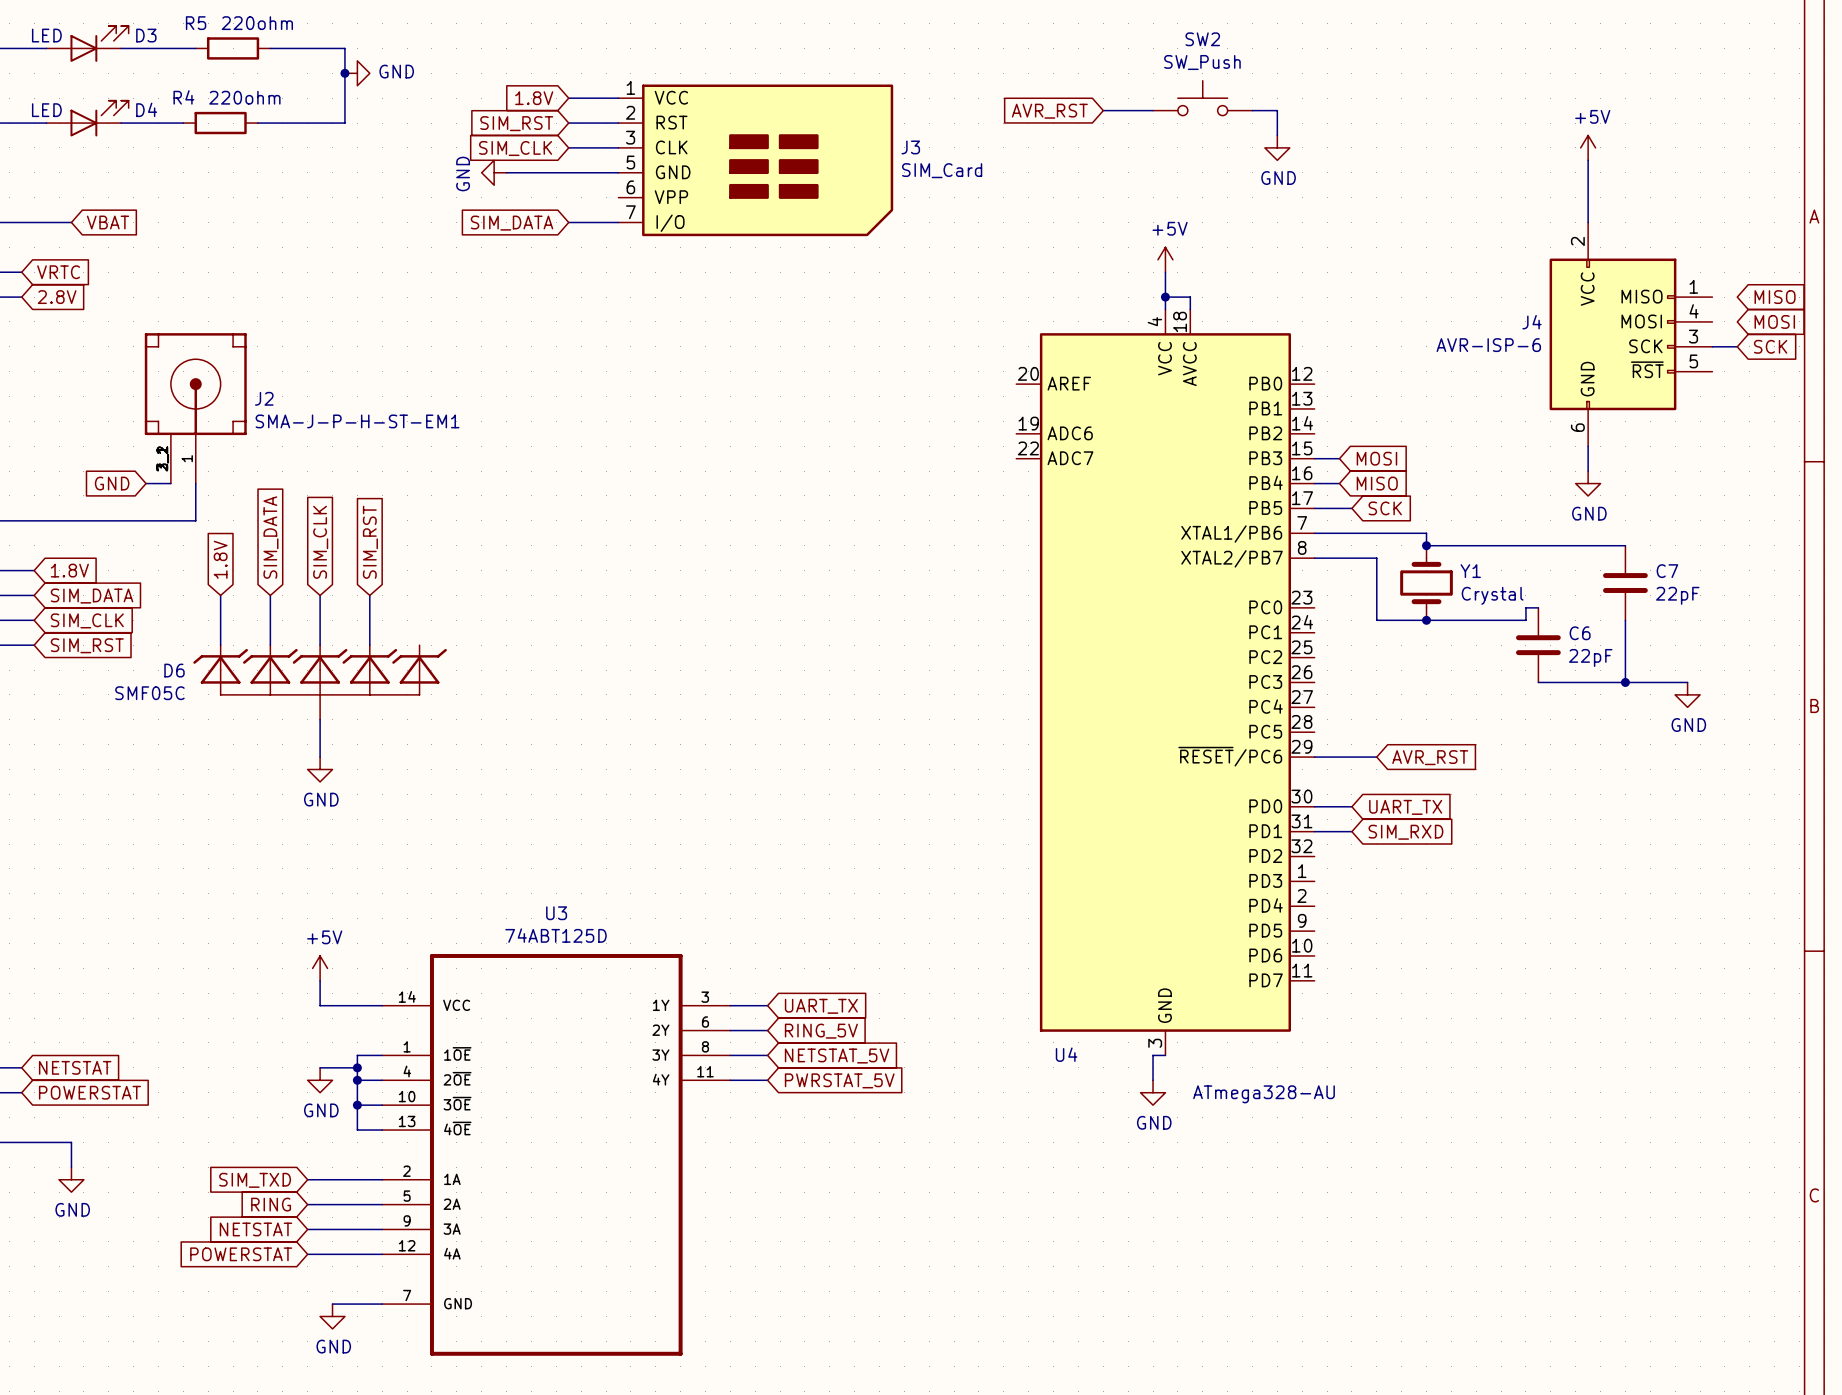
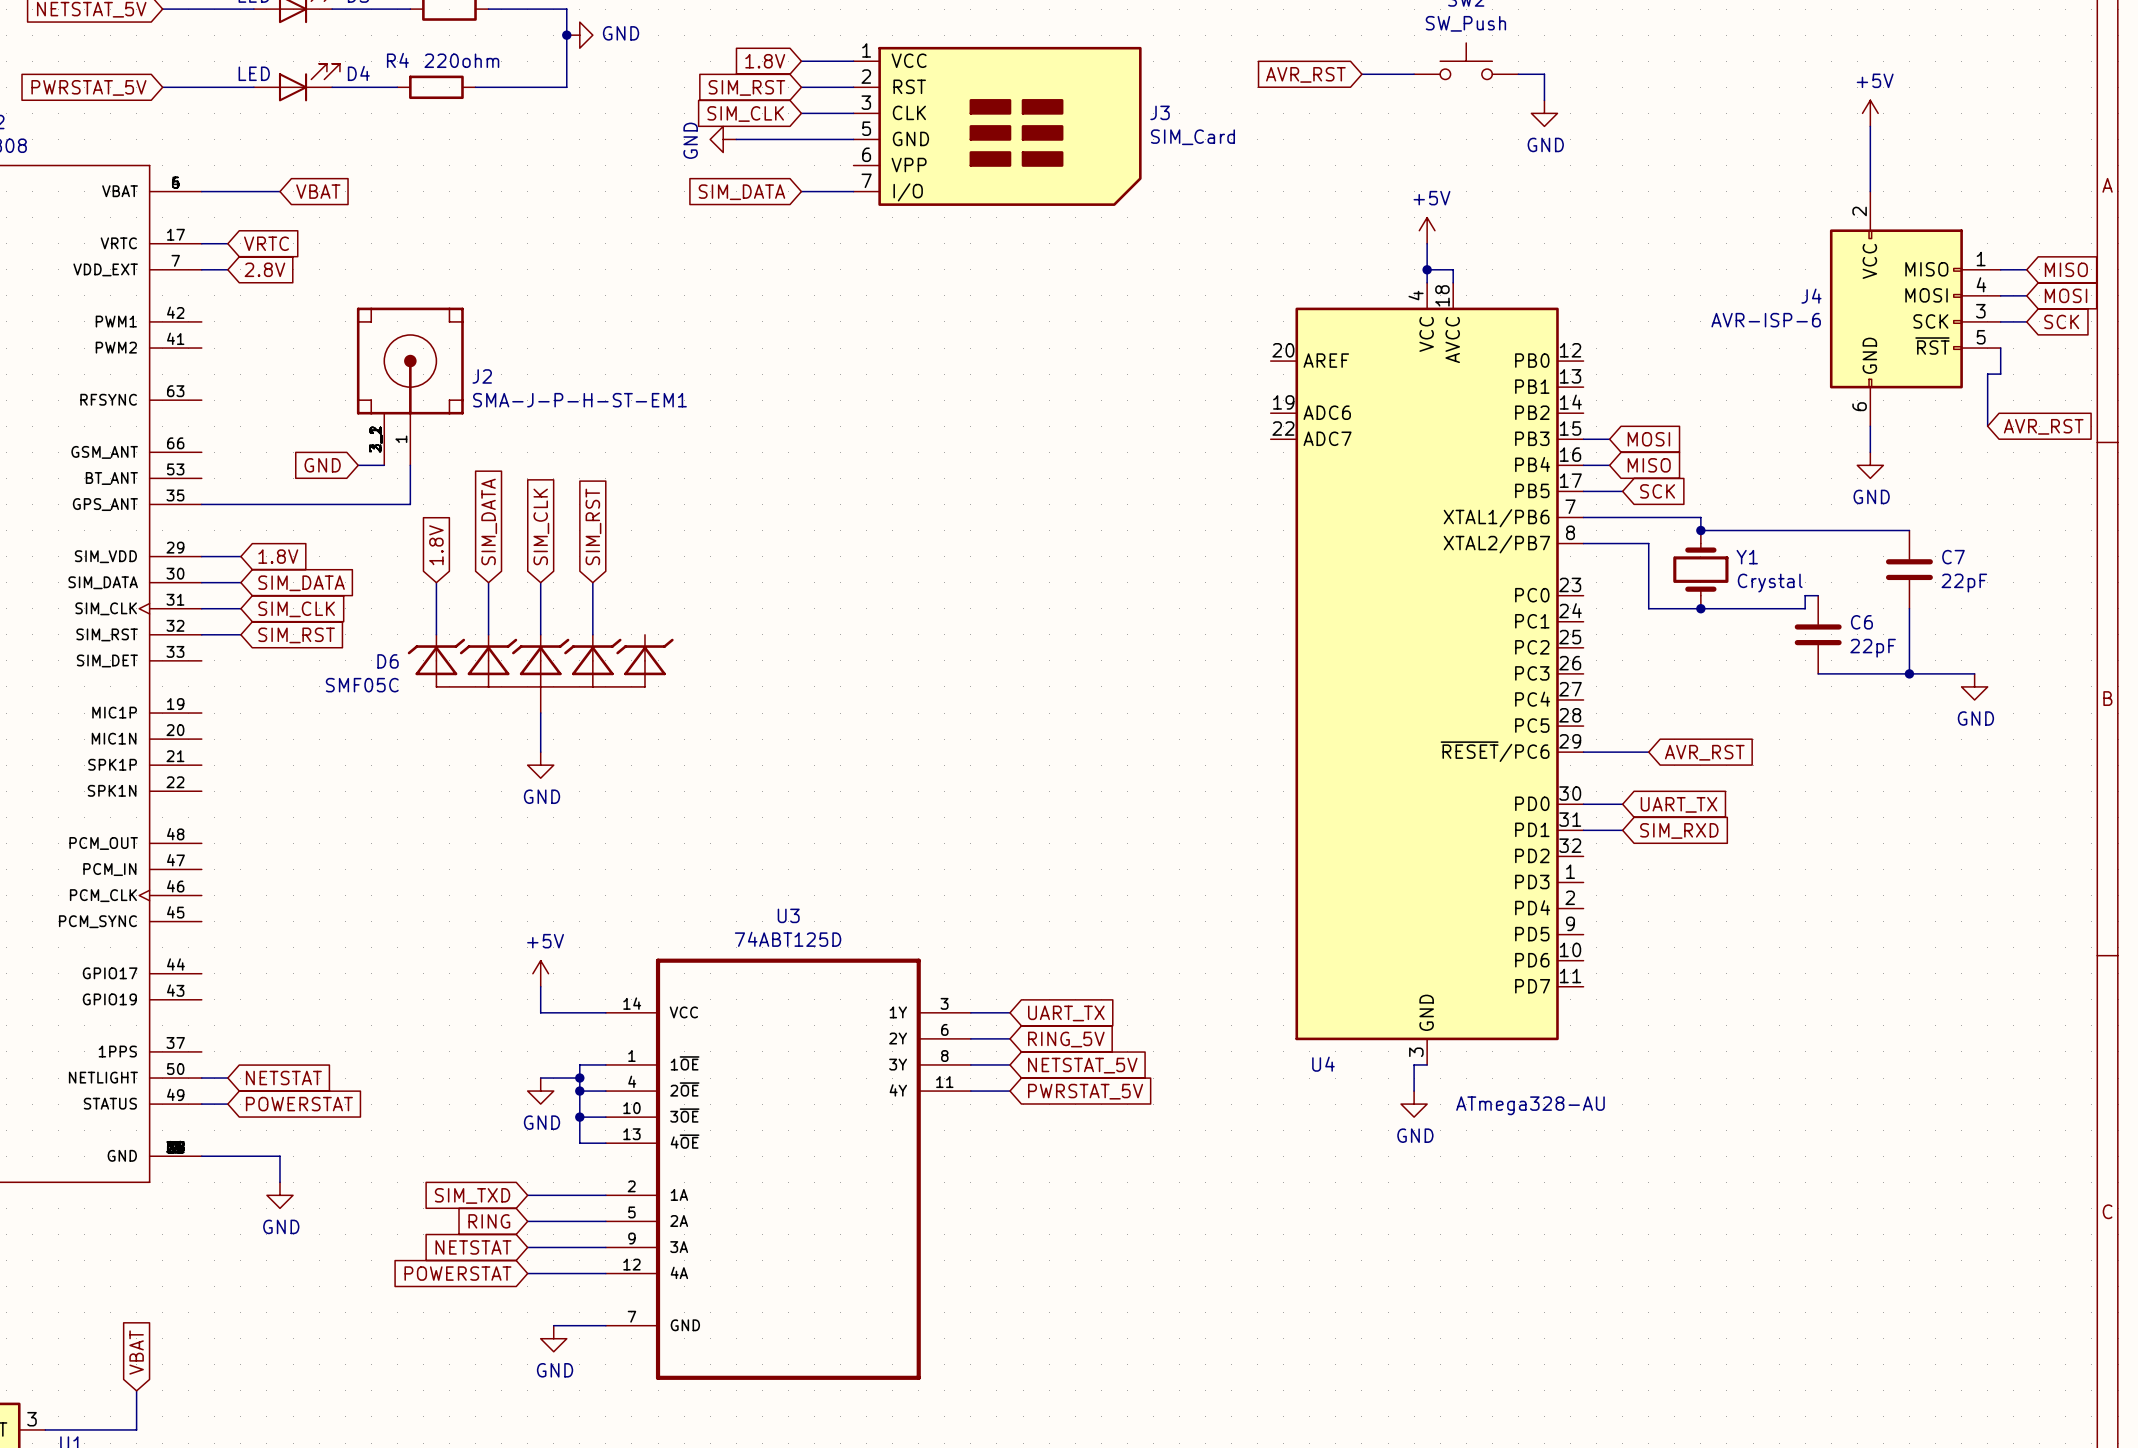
wire: none -> (2000, 269) (2026, 269)
wire: none -> (2000, 295) (2026, 295)
wire: none -> (2000, 348) (2000, 374) (1987, 374) (1987, 426)
global label: none -> AVR_RST (2043, 426)

